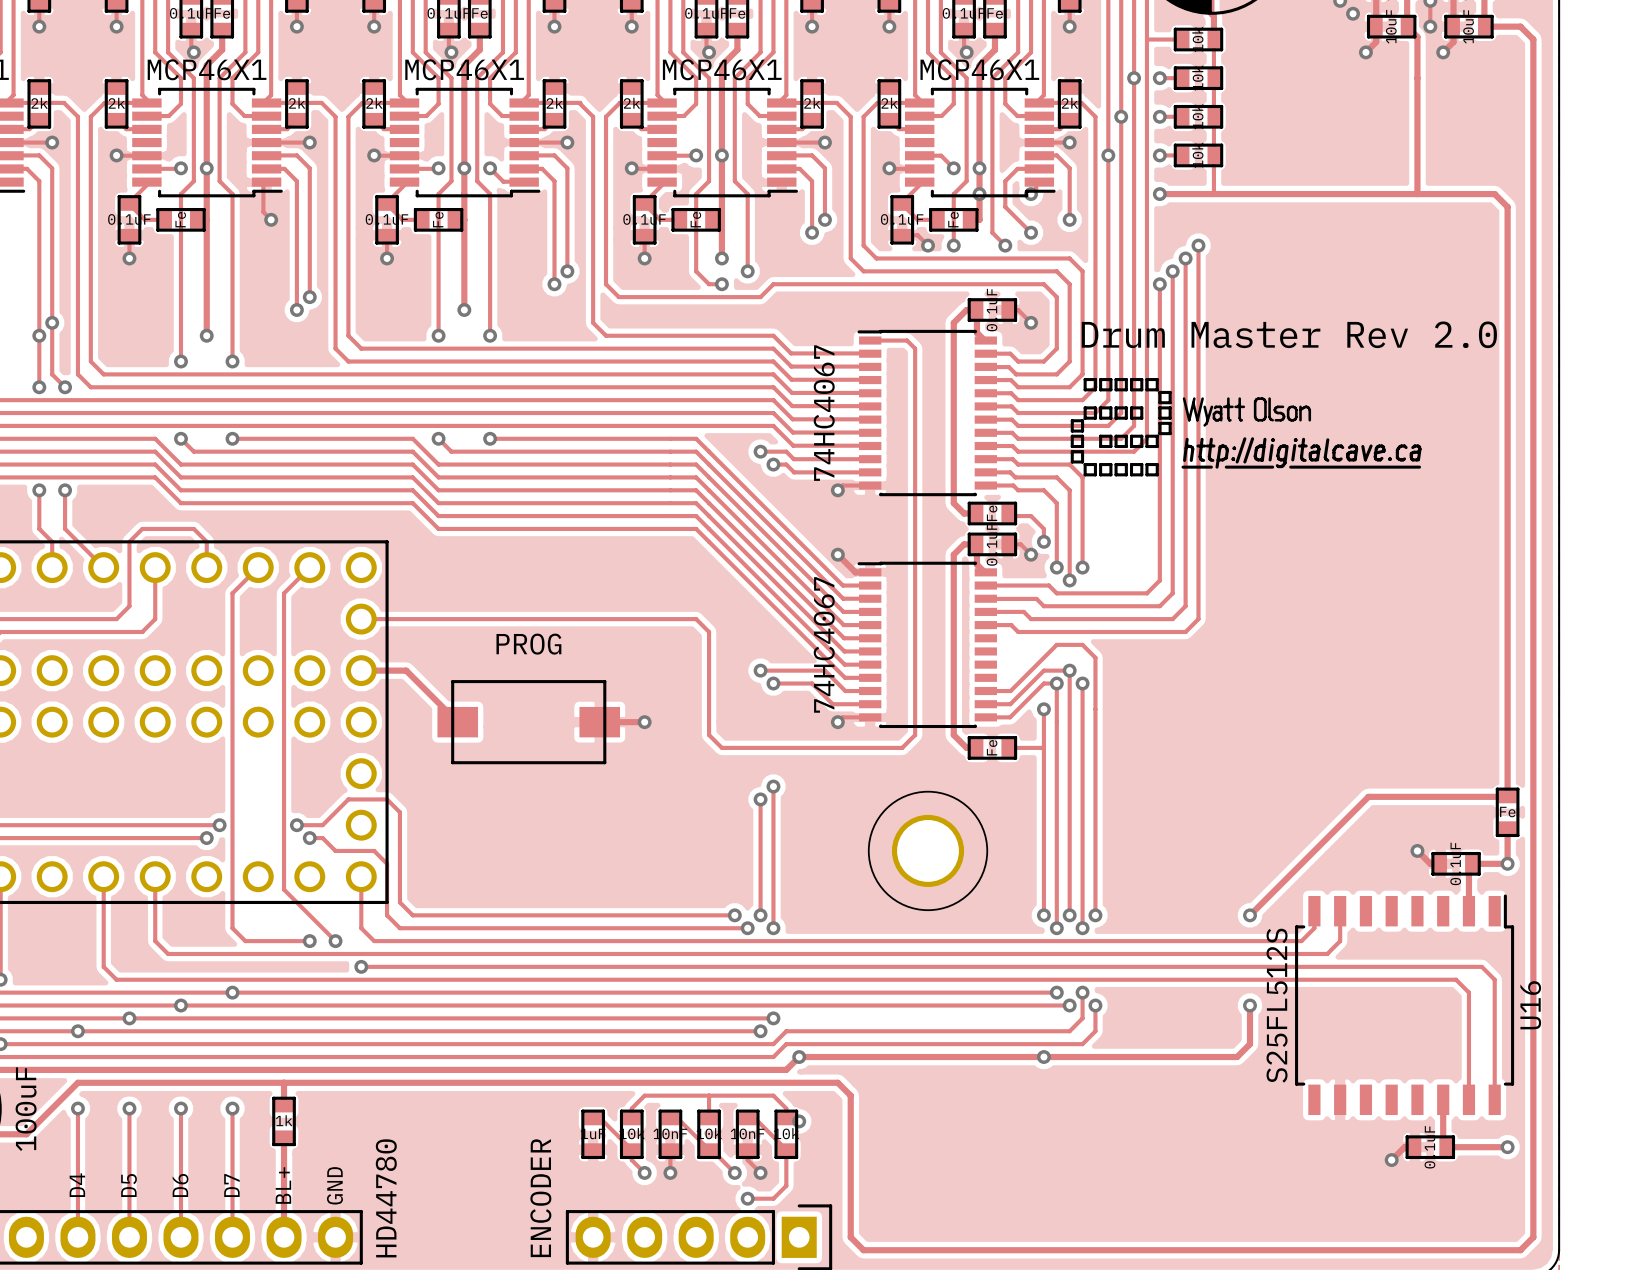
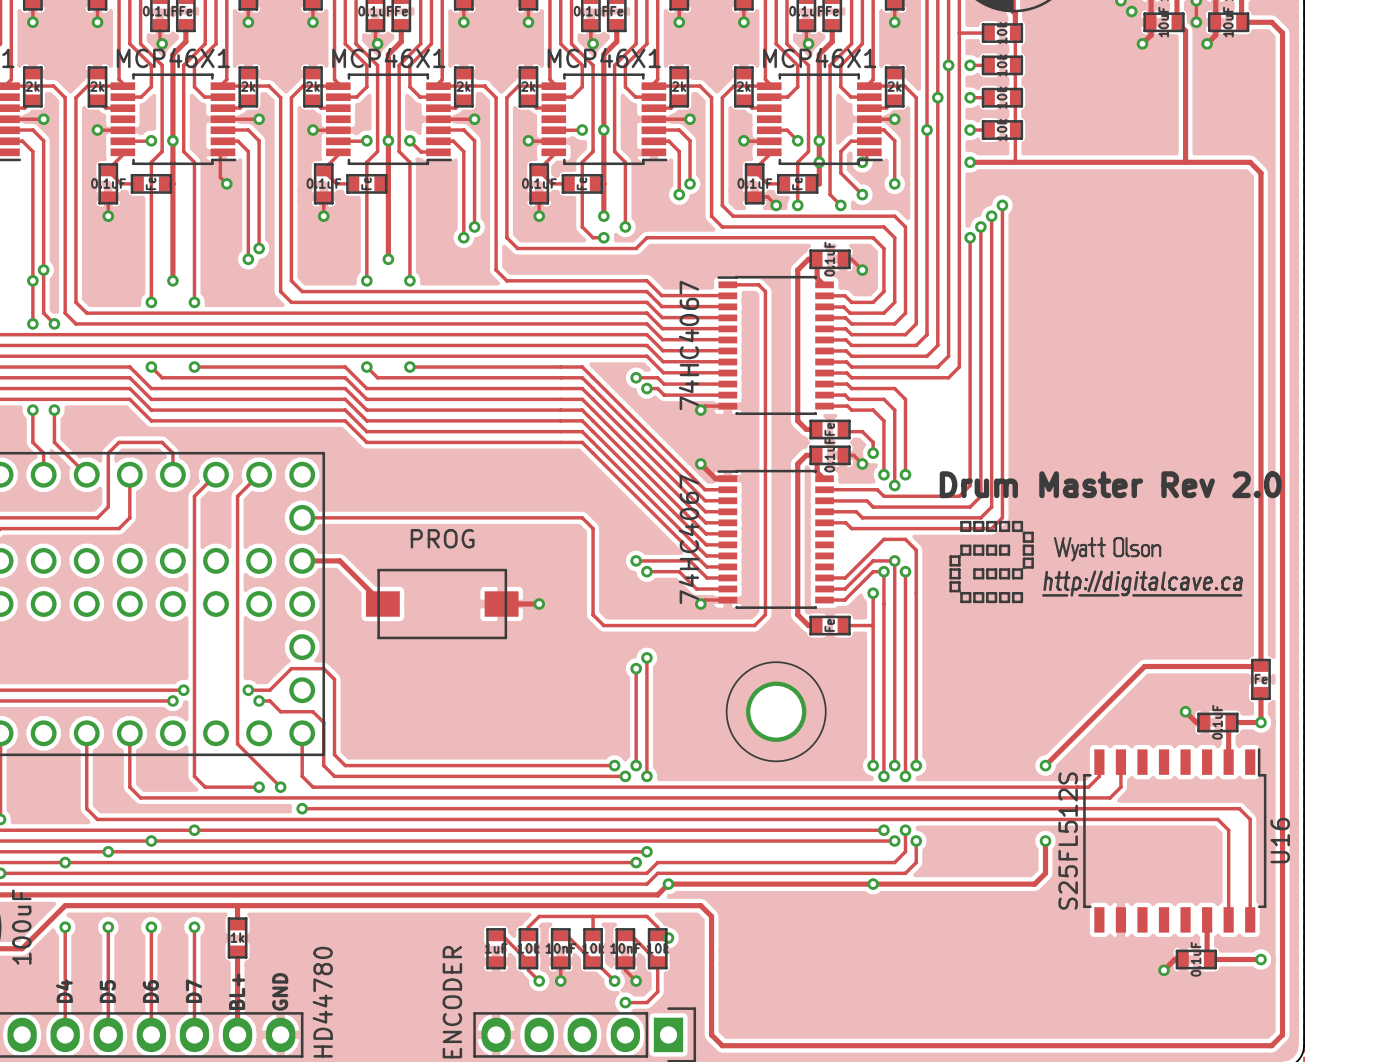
text position: Drum Master Rev 2.0 (1289, 334) -> Drum Master Rev 2.0 (1110, 484)
drawing position: (1246, 412) -> (1107, 549)
drawing position: (1121, 427) -> (991, 562)
drawing position: (1301, 452) -> (1142, 583)

